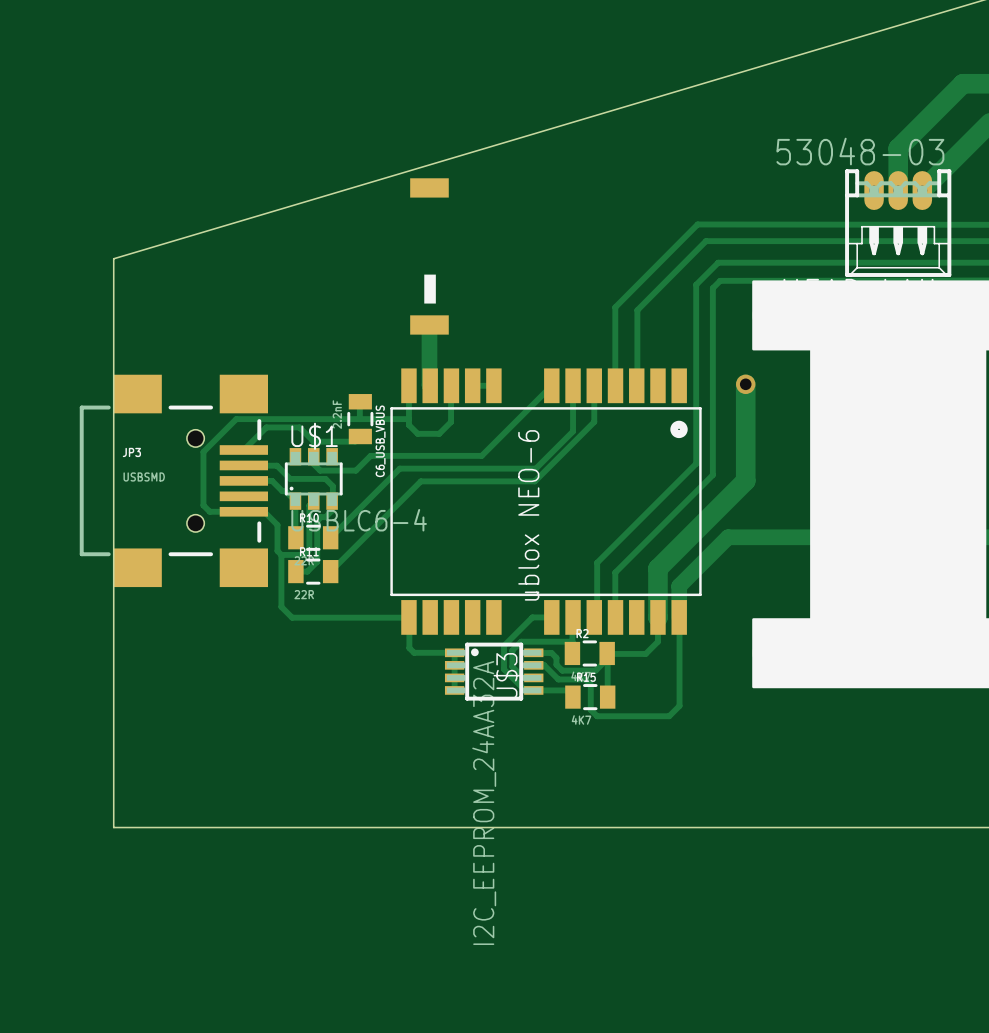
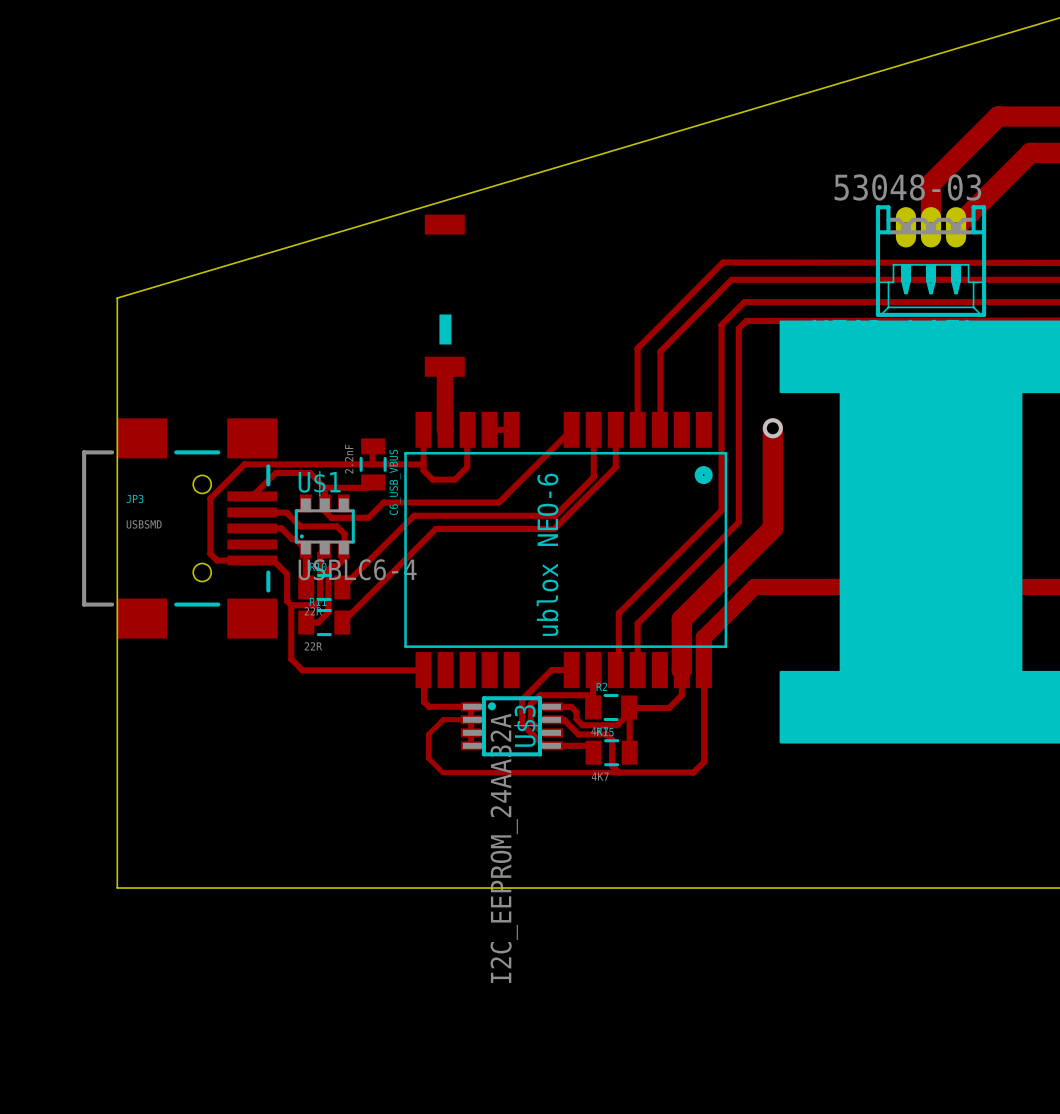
track: none -> (470, 719) (443, 719) (428, 734) (428, 758) (442, 772) (618, 772)

